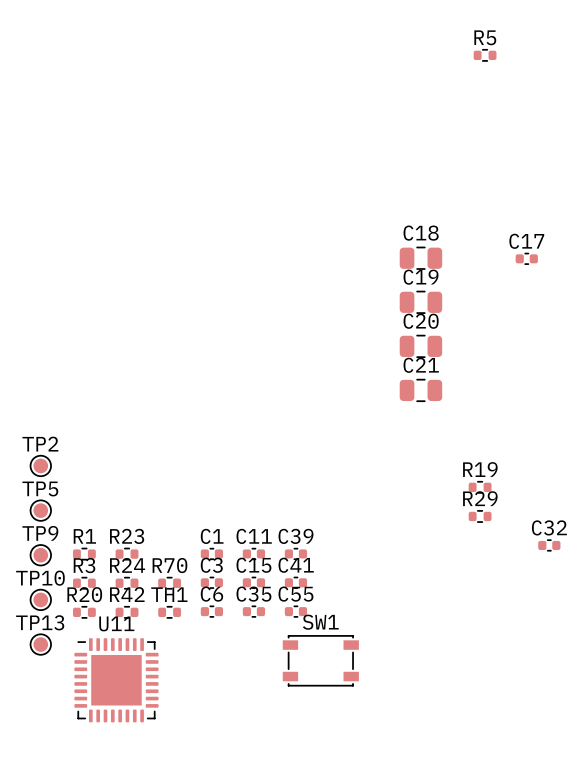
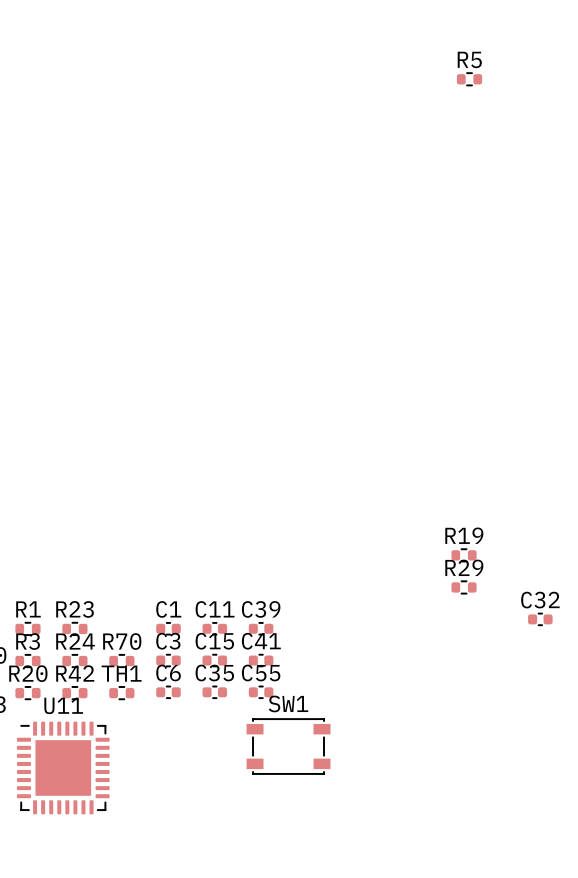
C18: (420, 258) -> none
C17: (526, 258) -> none
C19: (420, 302) -> none
C20: (420, 346) -> none
C21: (420, 390) -> none

